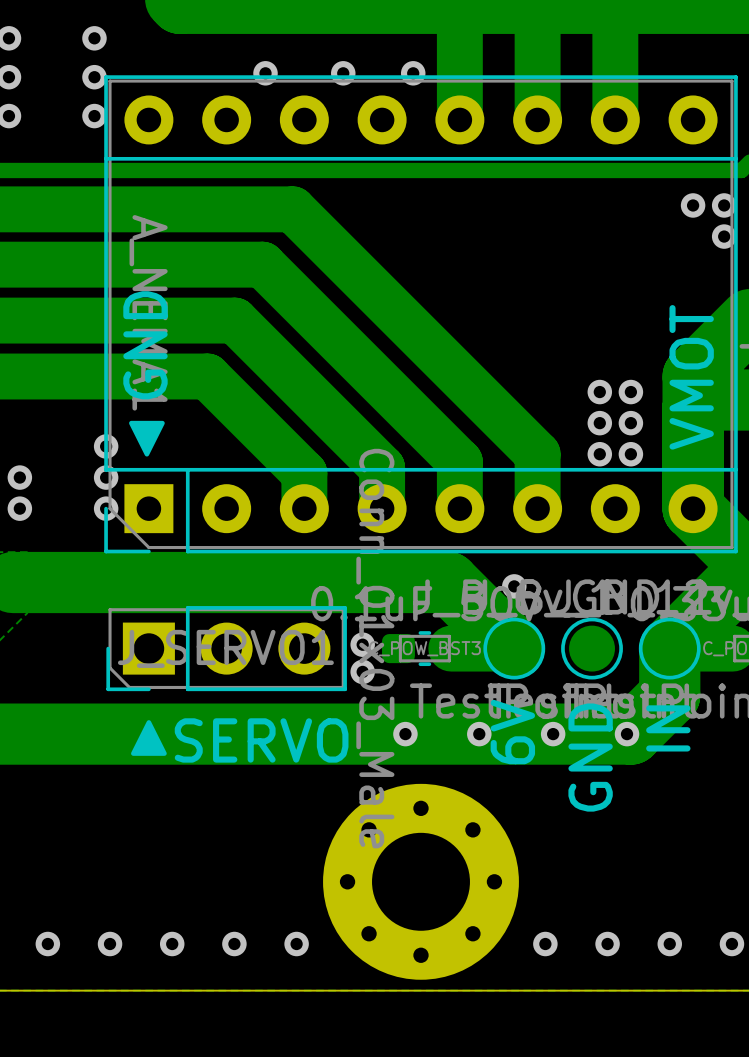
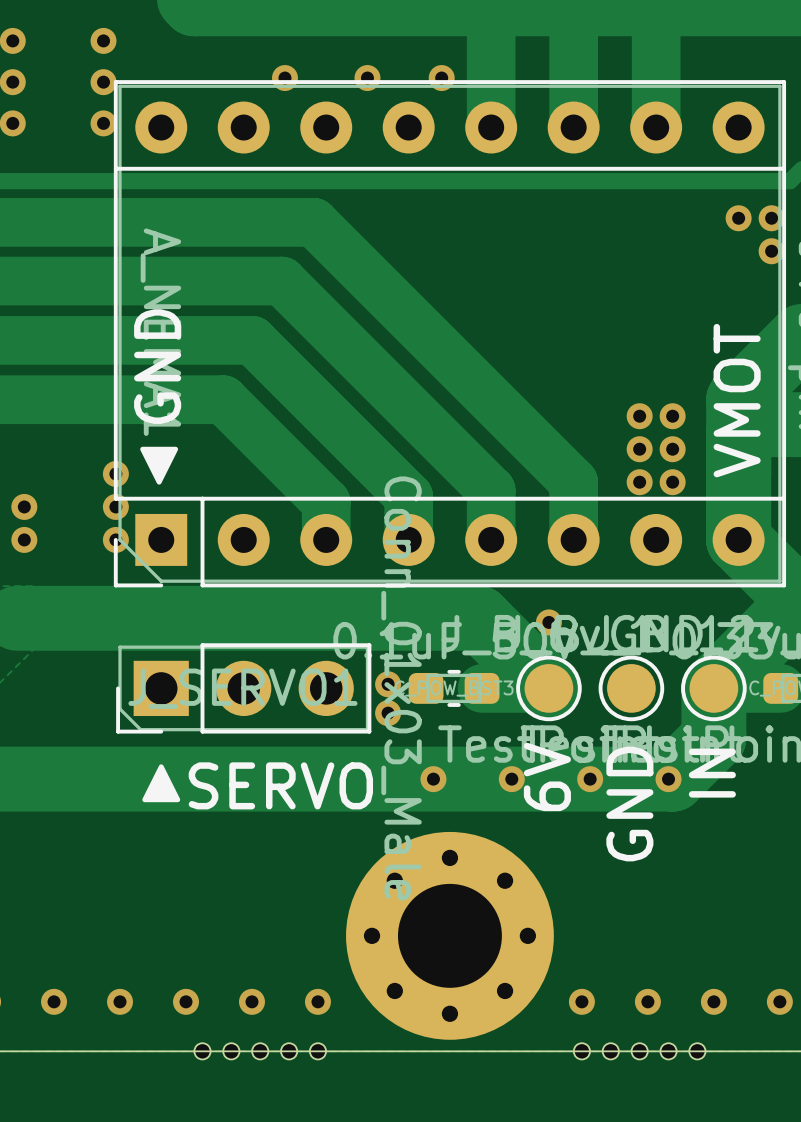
part: none -> (202, 1051)
part: none -> (231, 1051)
part: none -> (260, 1051)
part: none -> (289, 1051)
part: none -> (317, 1051)
part: none -> (581, 1051)
part: none -> (610, 1051)
part: none -> (639, 1051)
part: none -> (668, 1051)
part: none -> (697, 1051)

